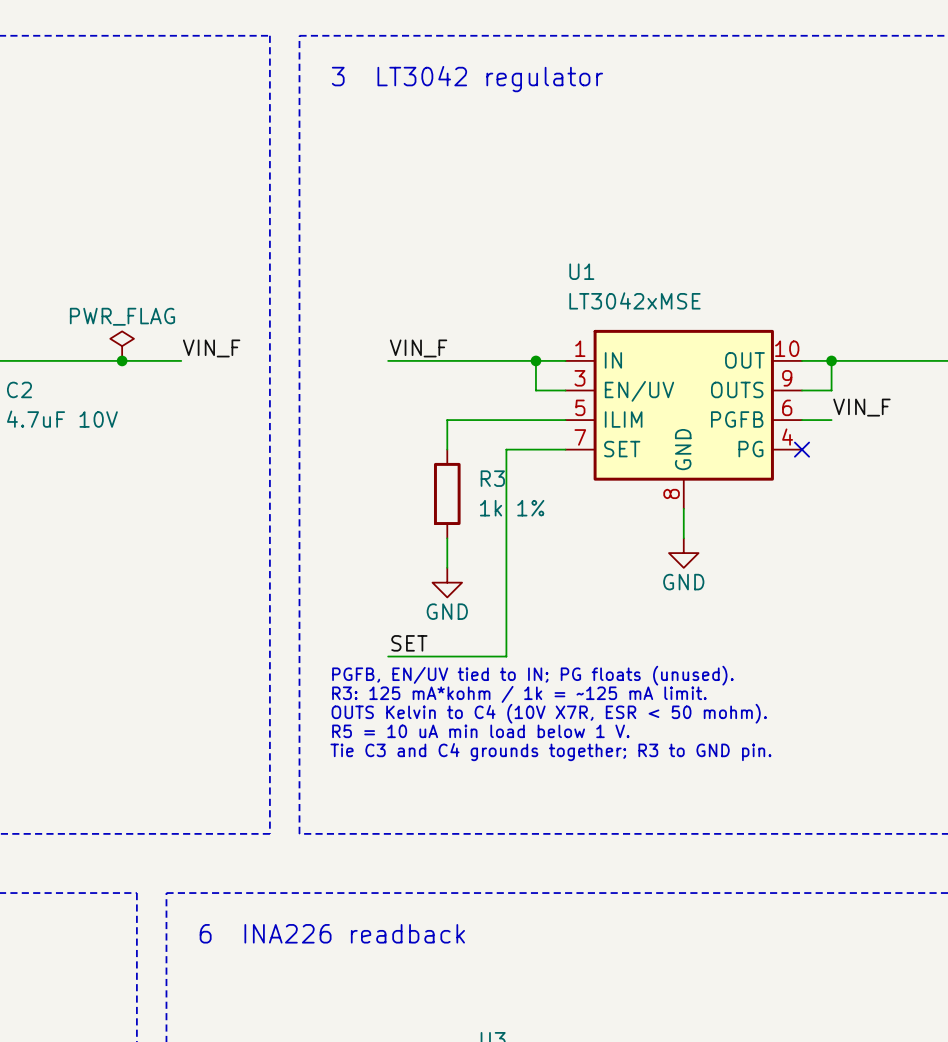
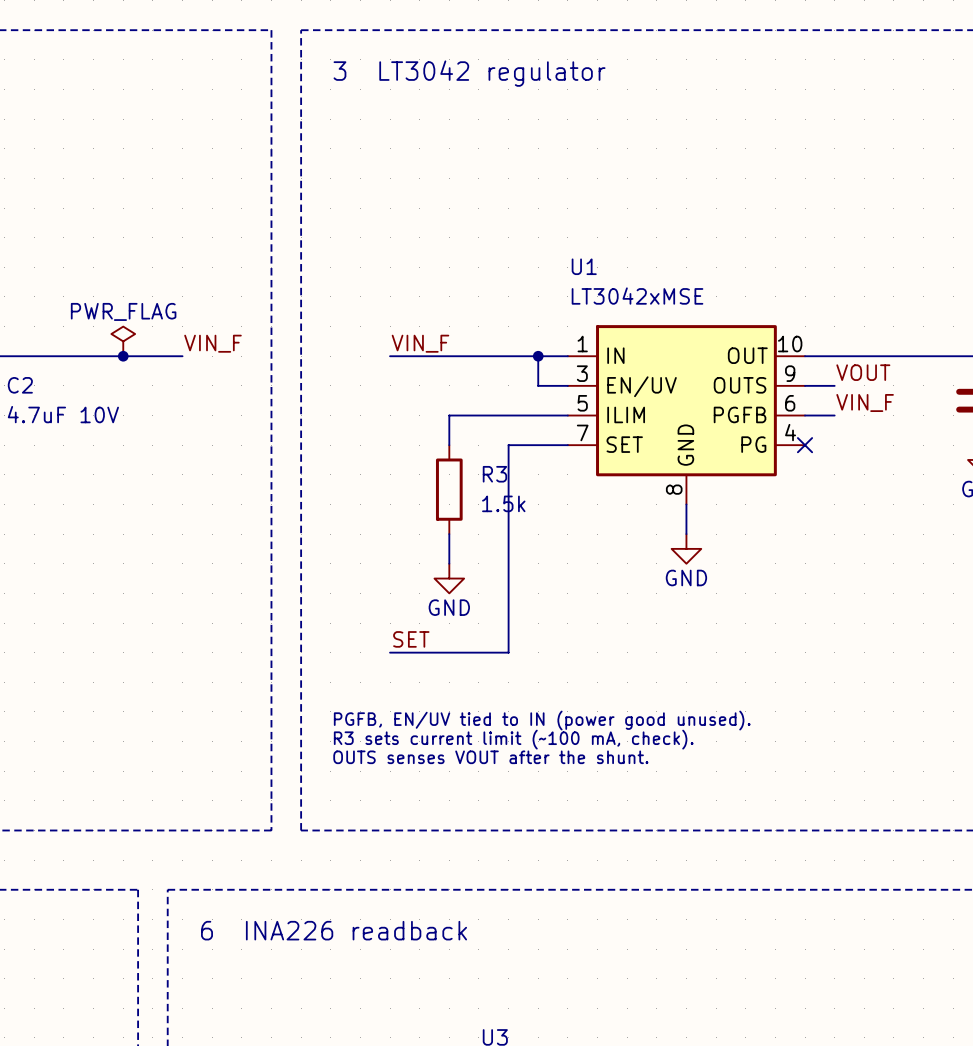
wire: (831, 360) (831, 390) -> none
junction: (831, 360) -> none
label: none -> VOUT (863, 372)
R3 value: 1k 1% (512, 508) -> 1.5k (503, 503)
text: PGFB, EN/UV tied to IN; PG floats (unused). (532, 675) -> none
text: R3: 125 mA*kohm / 1k = ~125 mA limit. (519, 694) -> none
text: OUTS Kelvin to C4 (10V X7R, ESR < 50 mohm). (549, 713) -> none
text: none -> PGFB, EN/UV tied to IN (power good unused). (542, 720)
text: R5 = 10 uA min load below 1 V. (480, 731) -> none
text: none -> R3 sets current limit (~100 mA, check). (513, 739)
text: Tie C3 and C4 grounds together; R3 to GND pin. (550, 752) -> none
text: none -> OUTS senses VOUT after the shunt. (490, 757)

